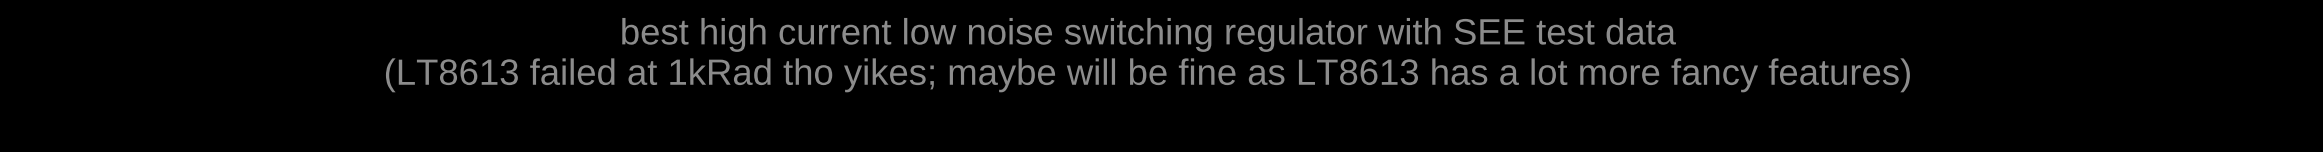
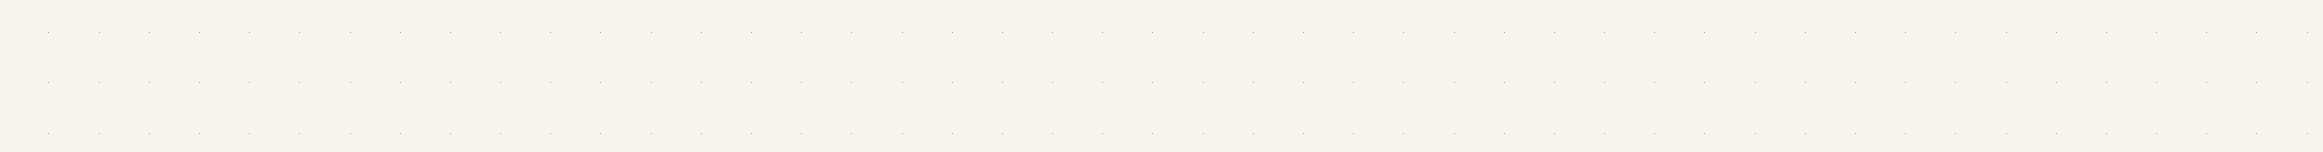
text: best high current low noise switching regulator with SEE test data (1149, 34) -> none
text: (LT8613 failed at 1kRad tho yikes; maybe will be fine as LT8613 has a lot more fancy features) (1147, 75) -> none

